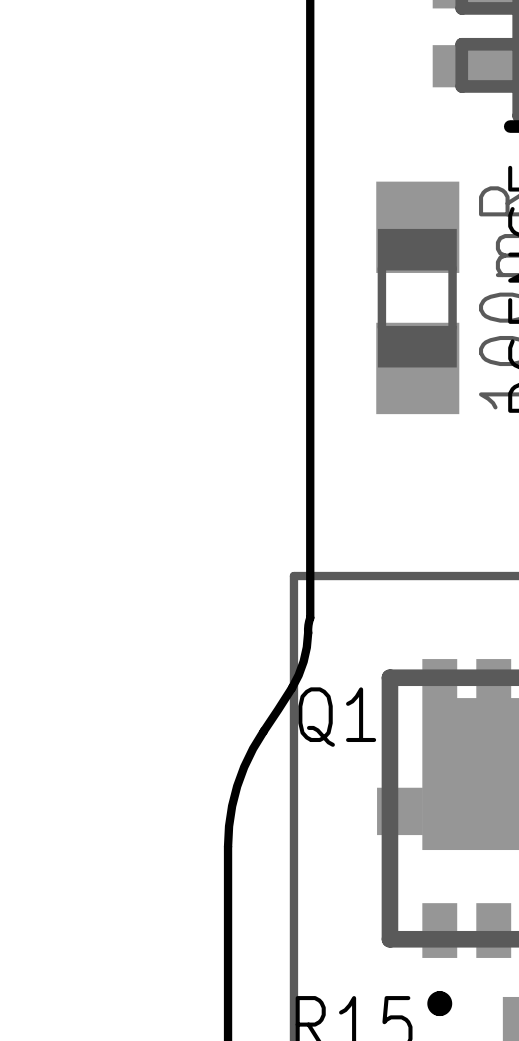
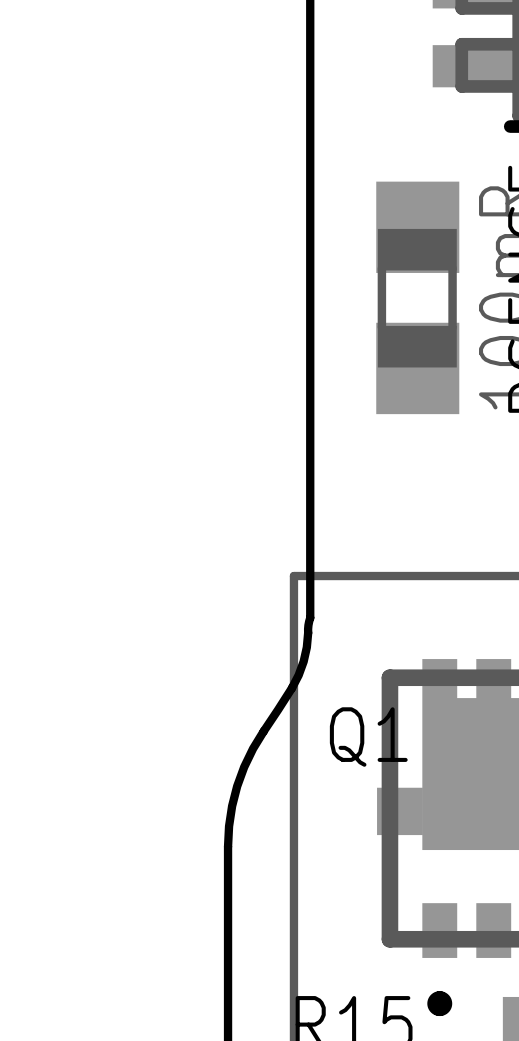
Q1 name position: Q1 (337, 717) -> Q1 (368, 737)

